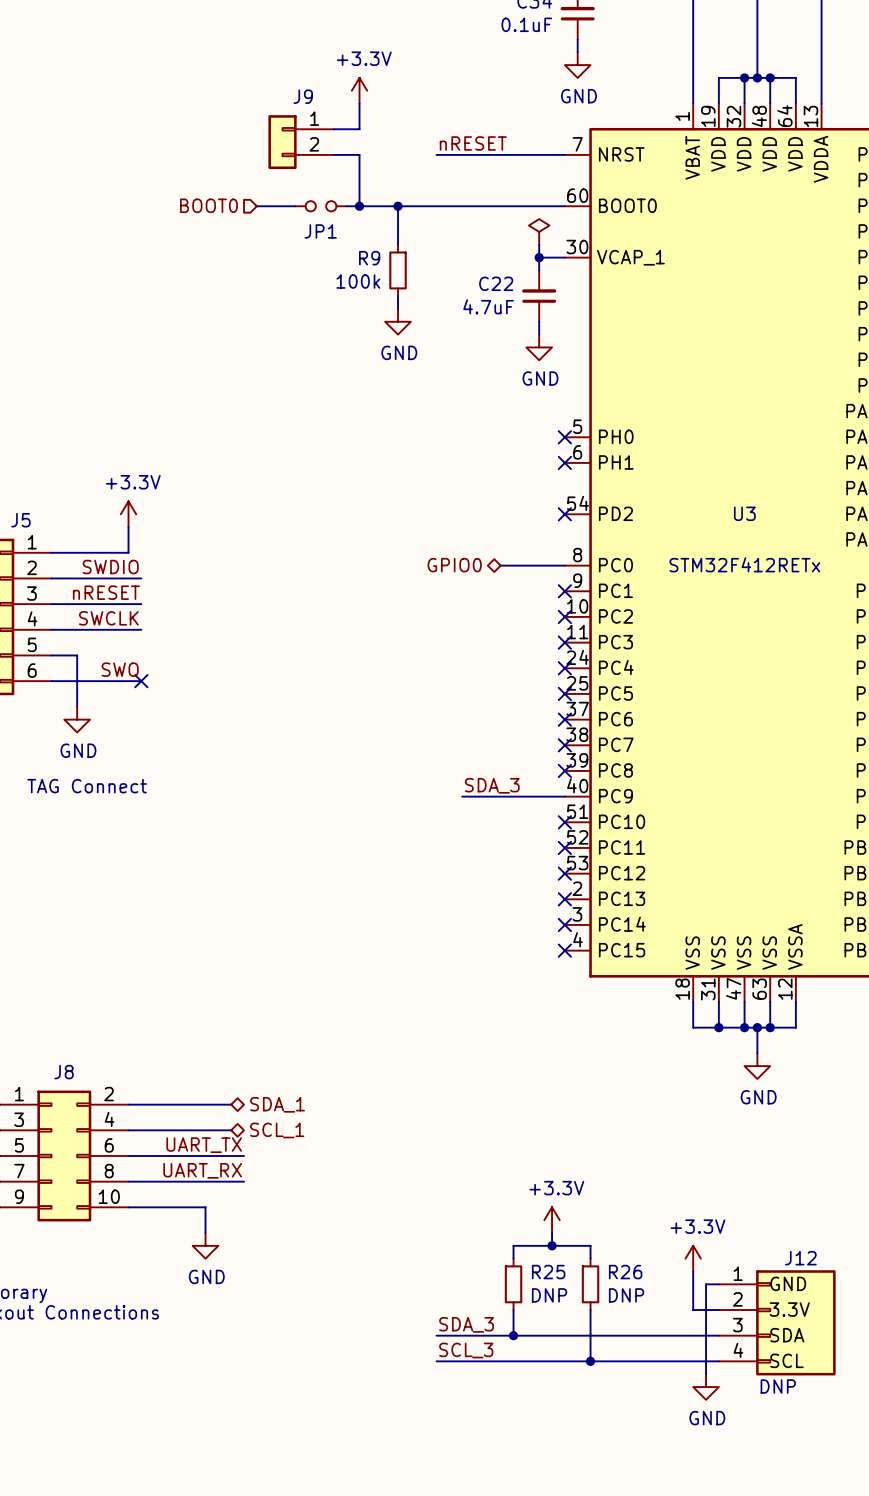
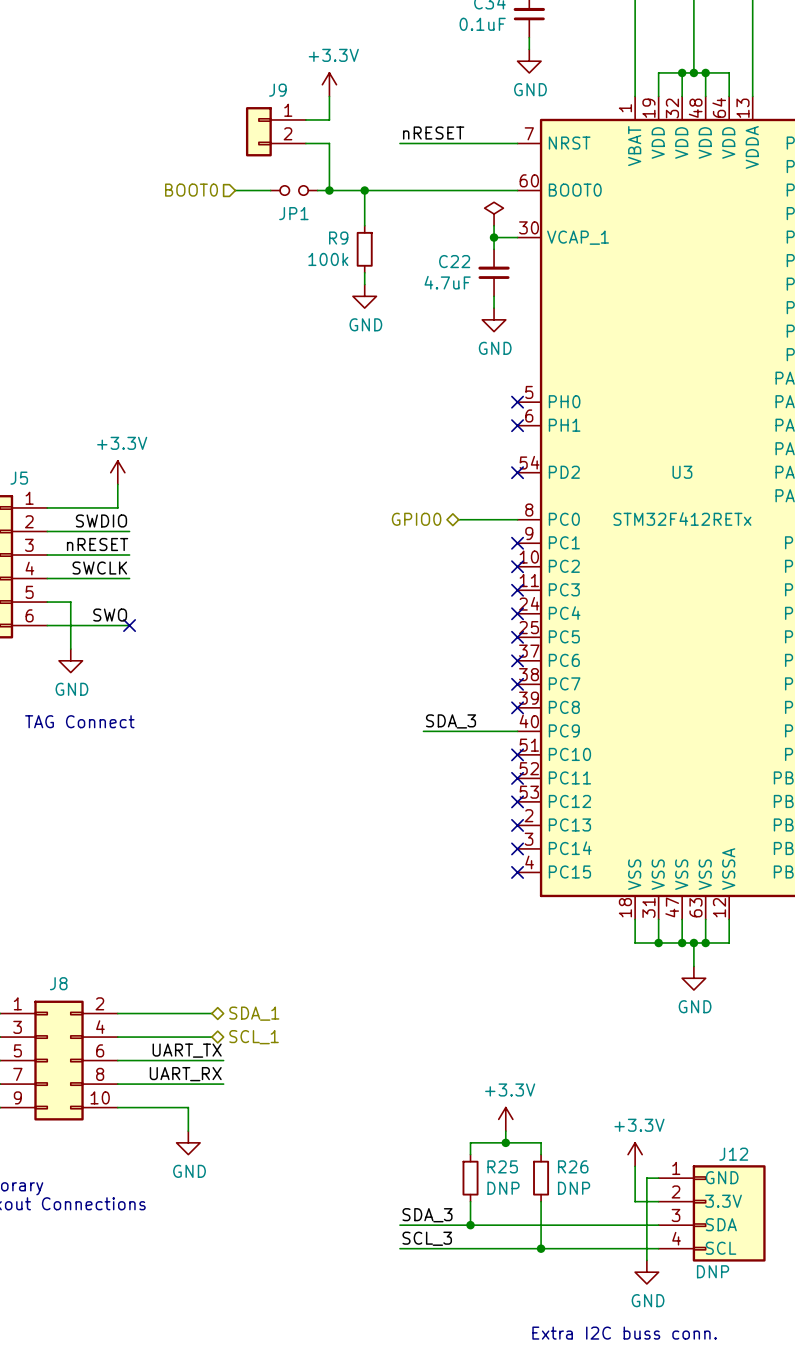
text: none -> Extra I2C buss conn. (624, 1333)

